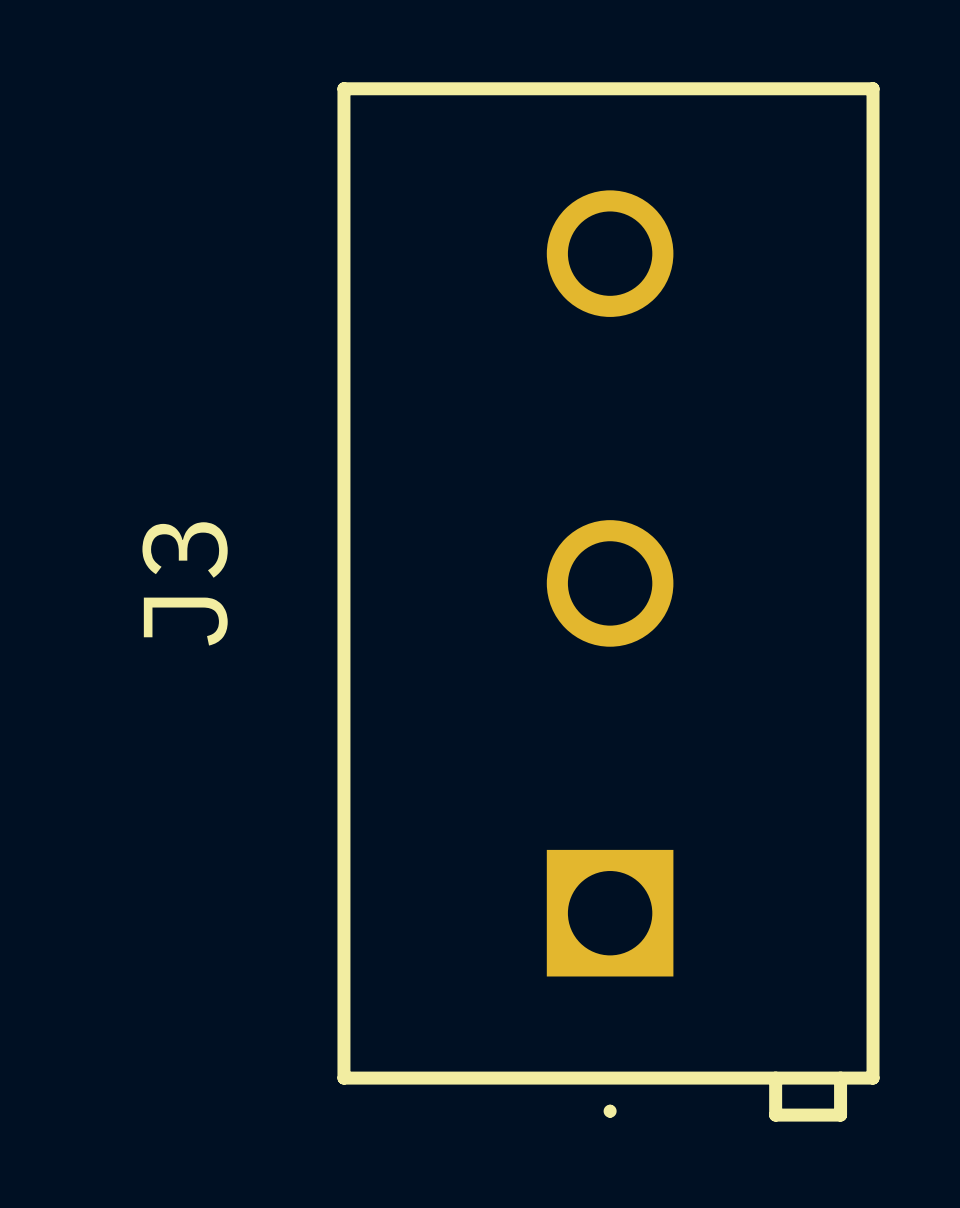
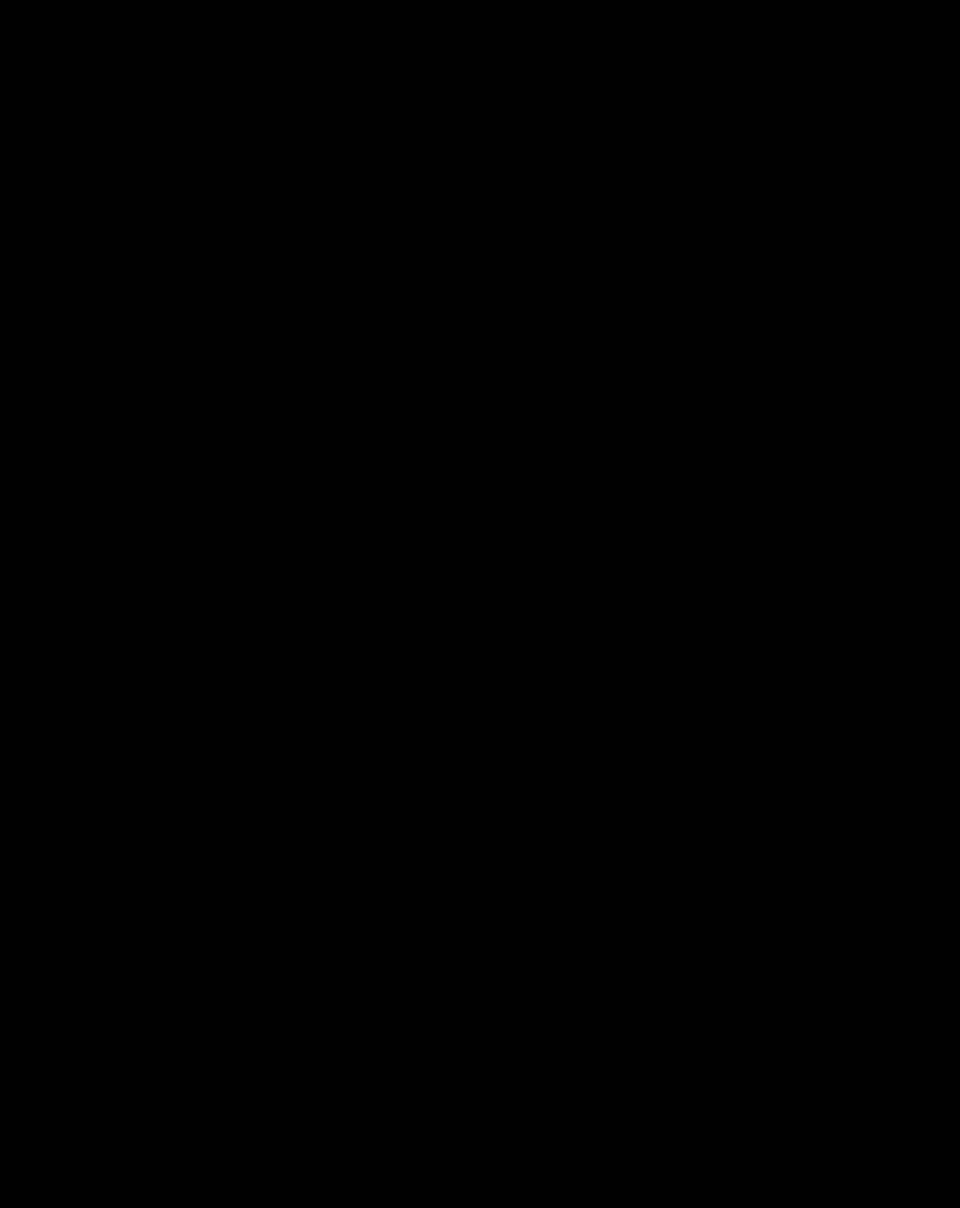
J3: (608, 601) -> none

